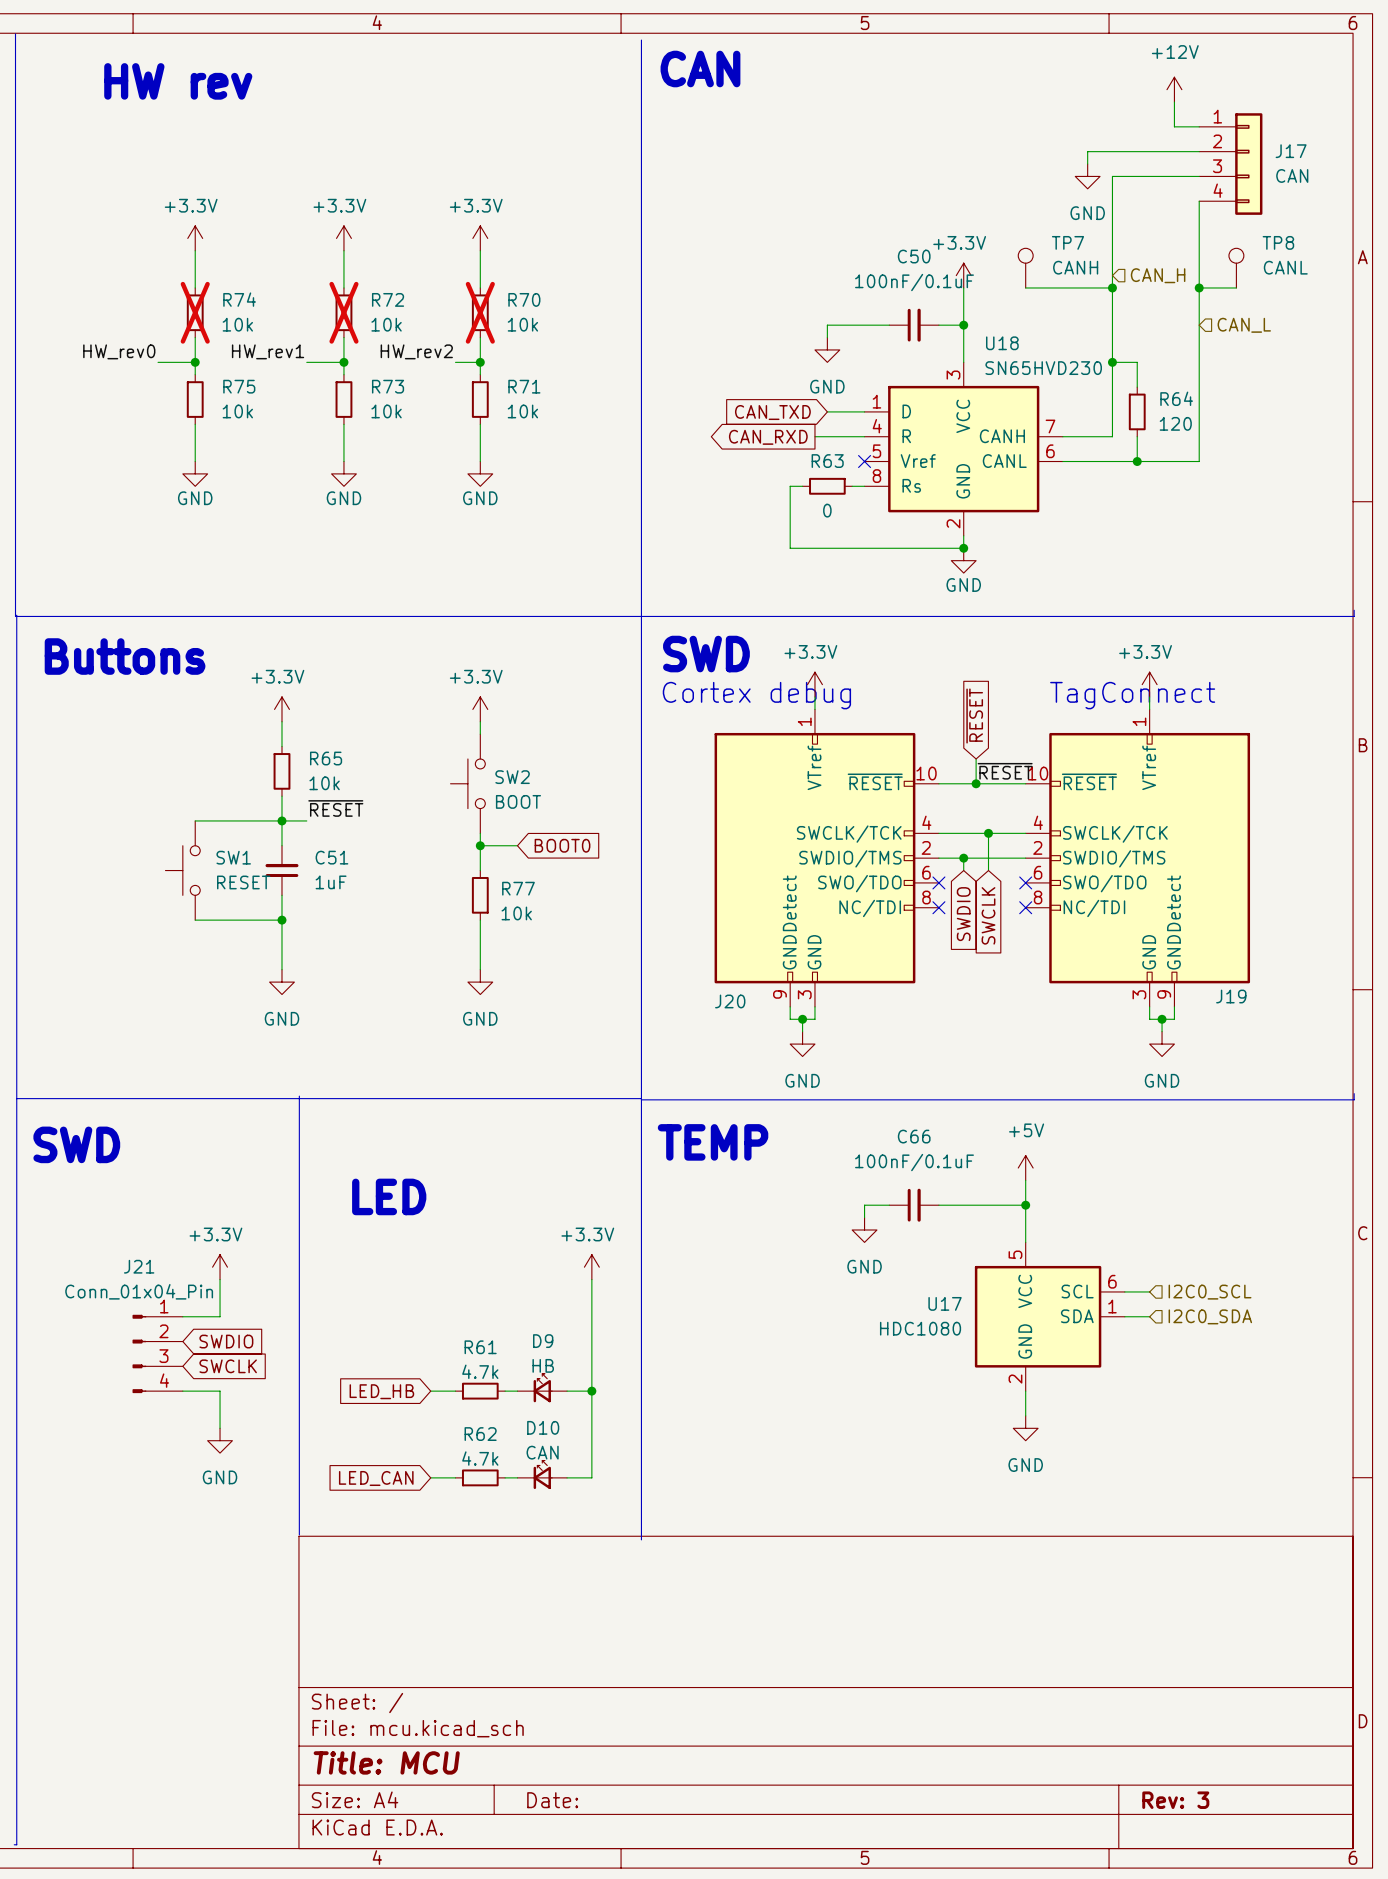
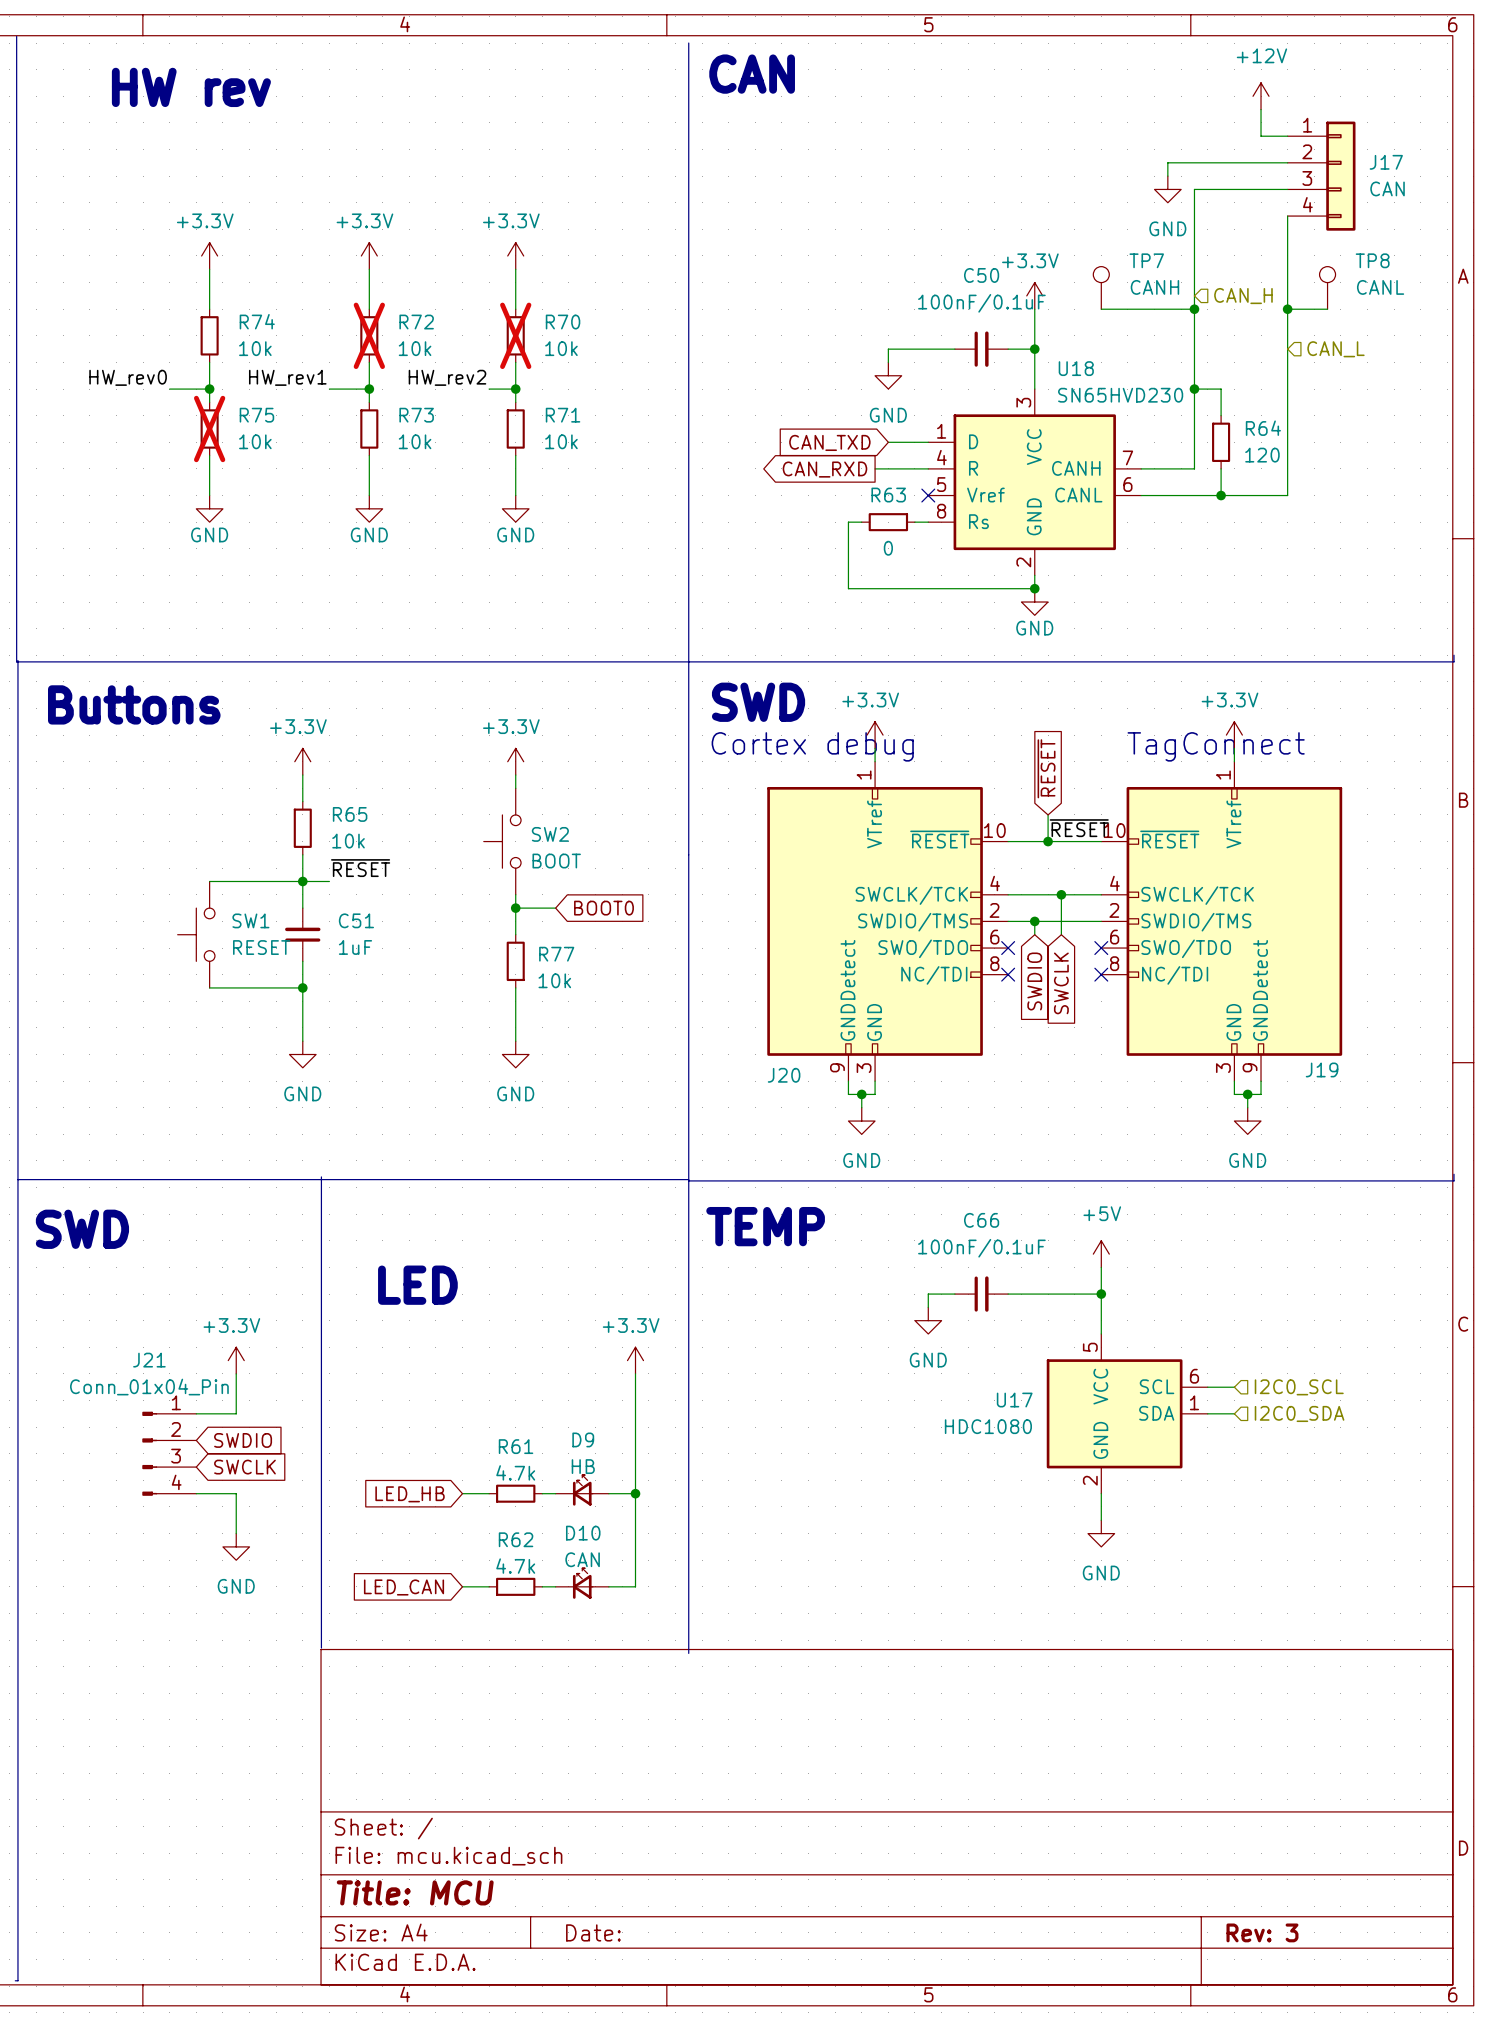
R74 do-not-place cross: (195, 312) -> none
R75 do-not-place cross: none -> (209, 428)

